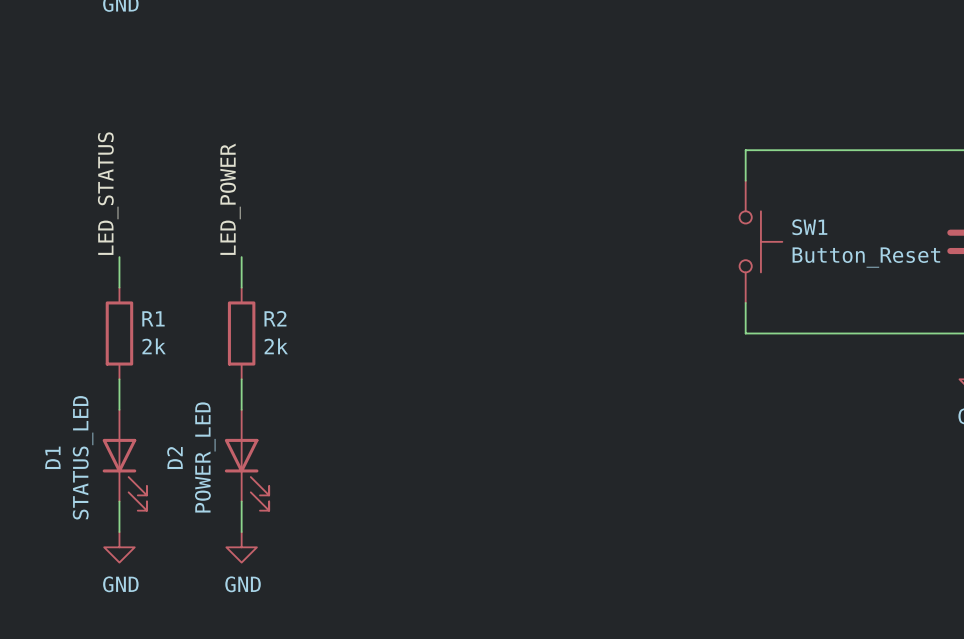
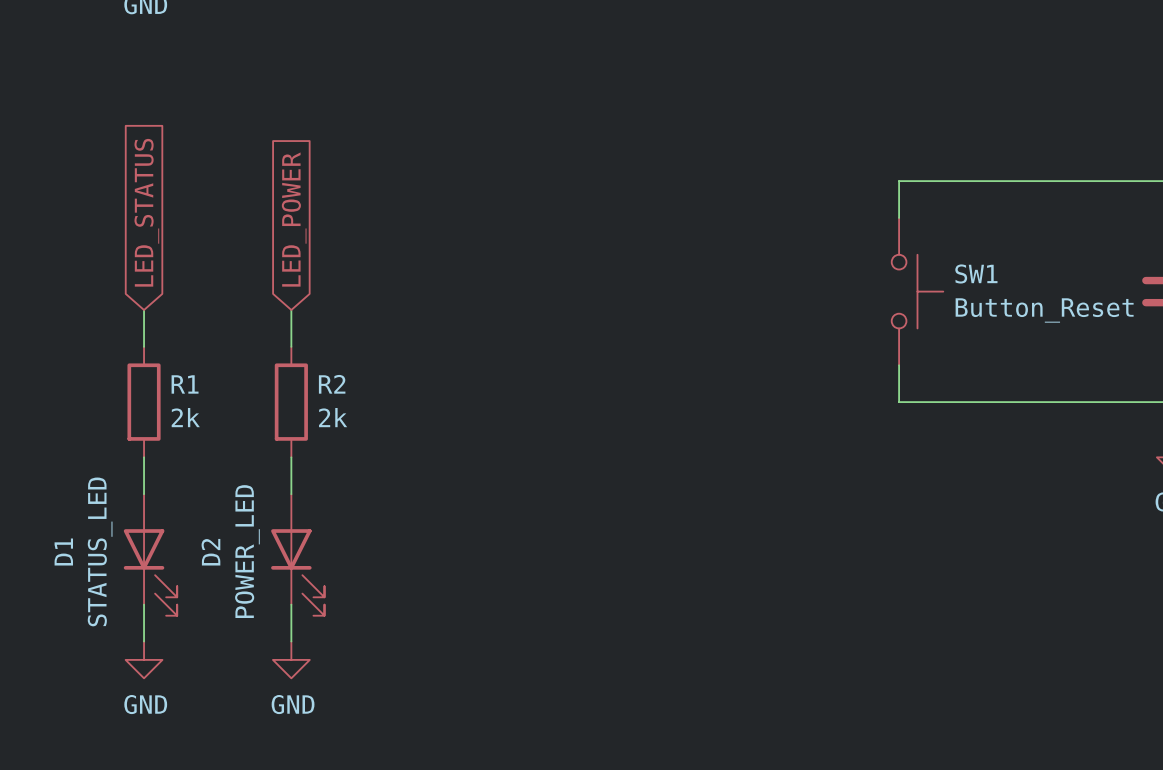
global label: none -> LED_STATUS (146, 212)
global label: none -> LED_POWER (294, 219)
label: LED_STATUS (108, 193) -> none
label: LED_POWER (230, 199) -> none

